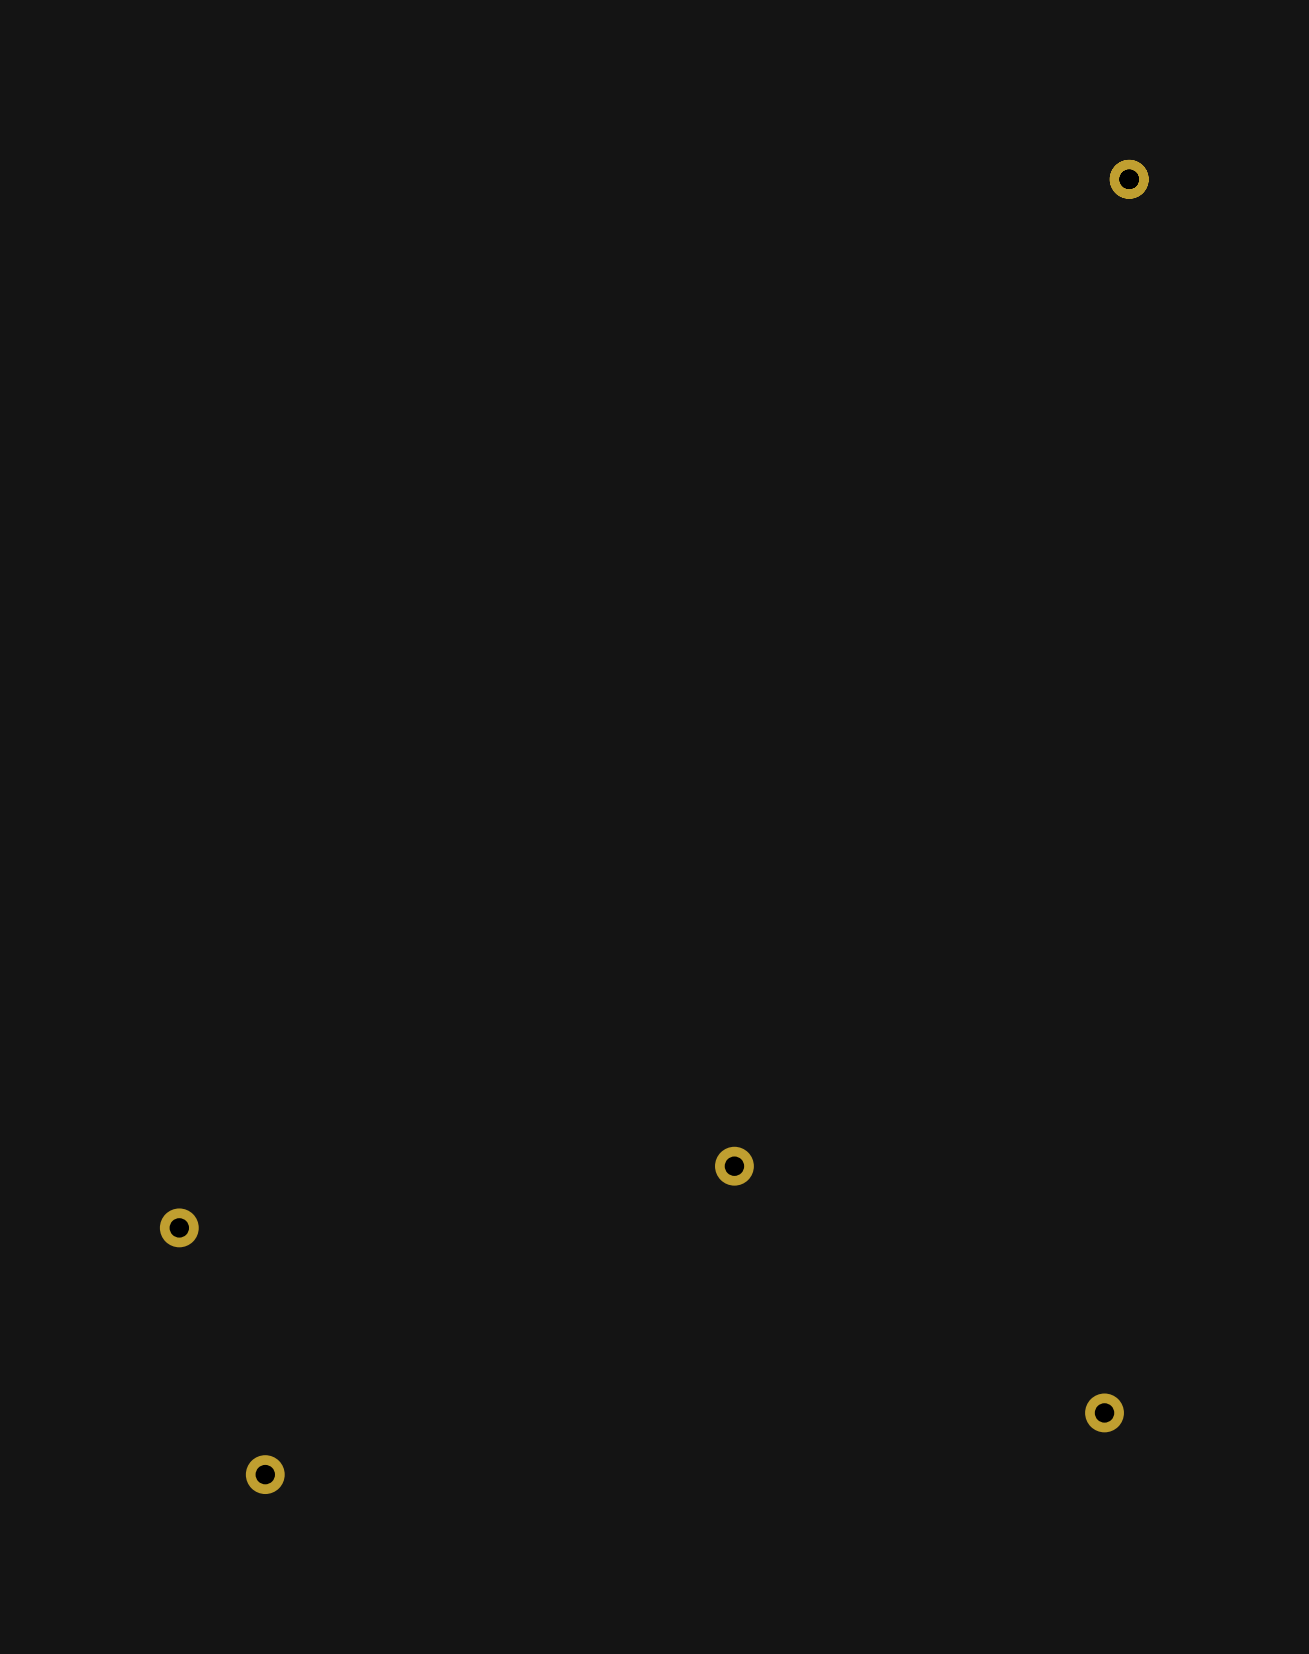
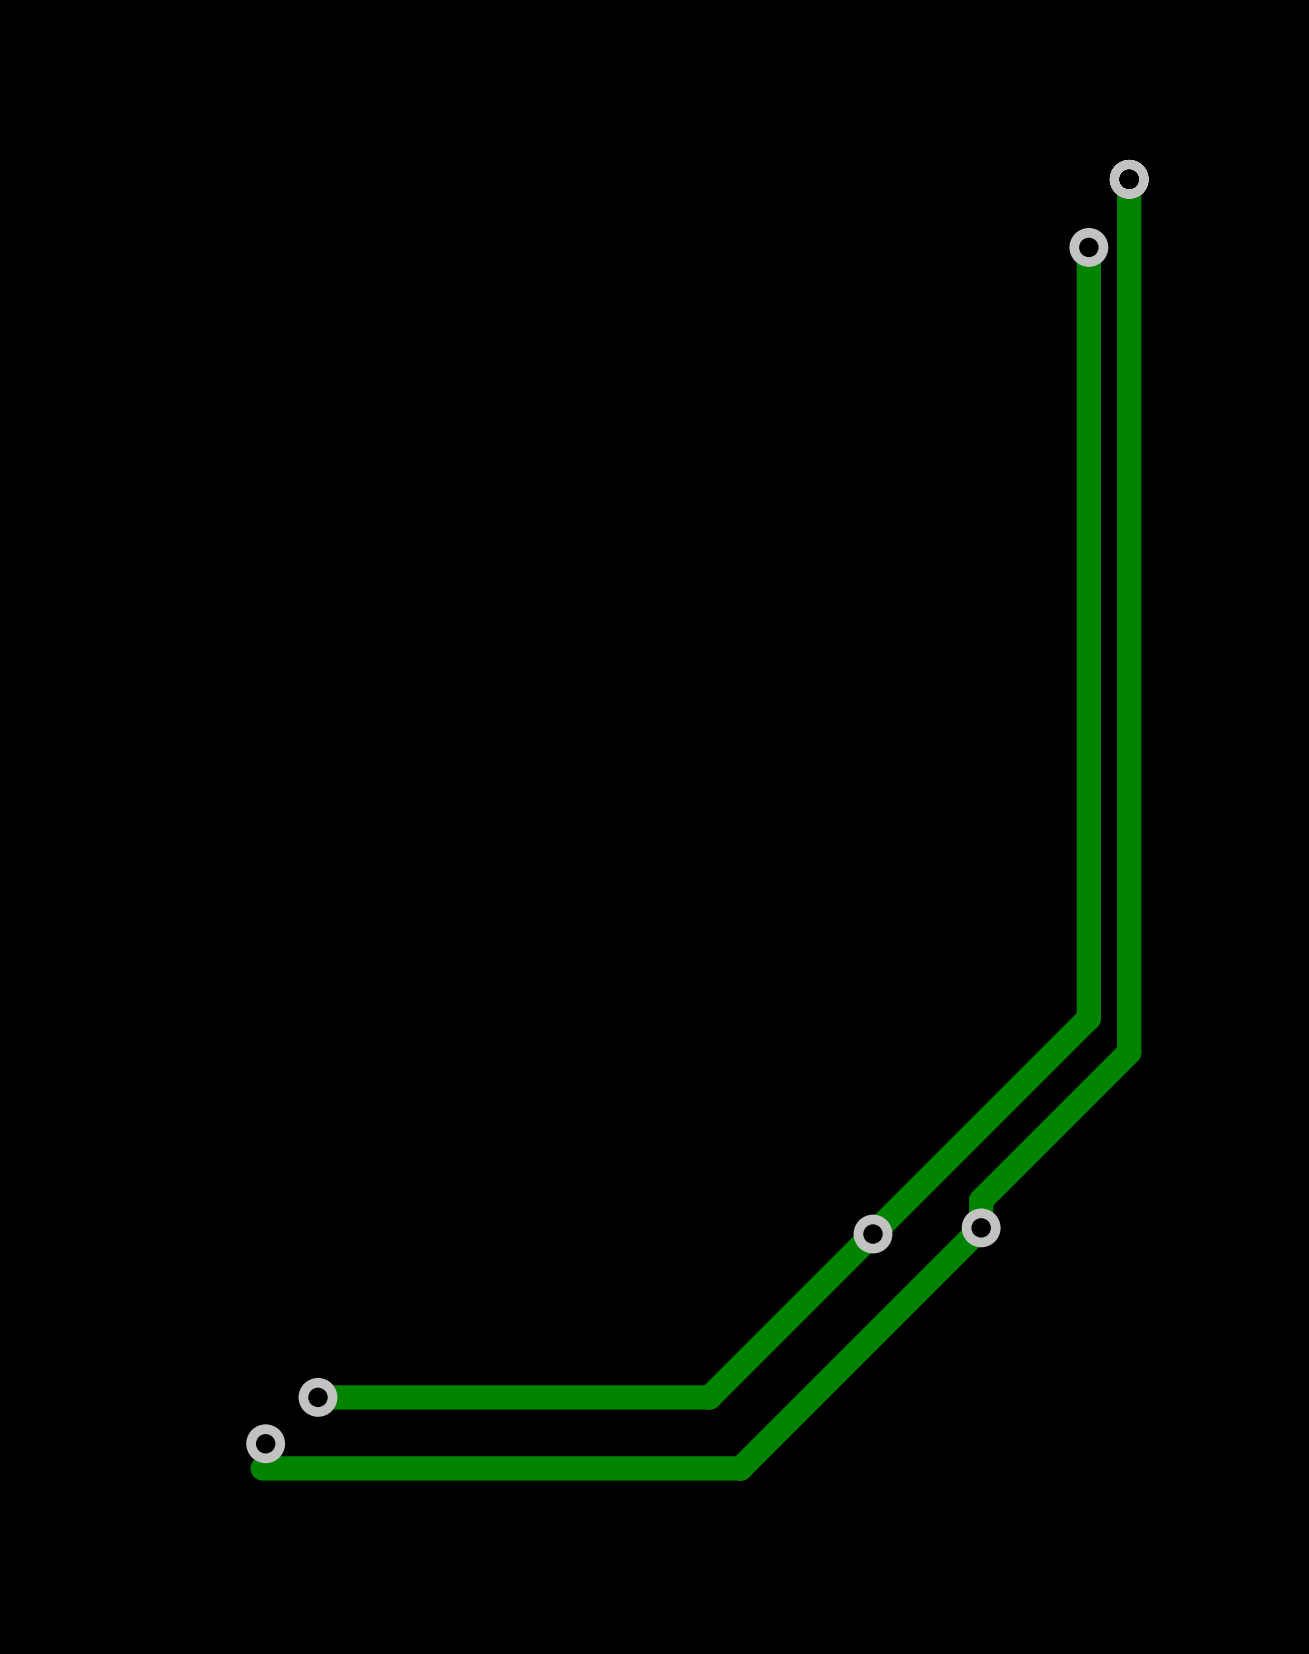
track: none -> (1129, 179) (1129, 1052) (981, 1200) (981, 1227) (740, 1468) (262, 1468)
track: none -> (1088, 247) (1088, 1018) (709, 1397) (317, 1397)
via: none -> (1088, 247)
via: (734, 1166) -> none
via: (179, 1227) -> none
via: none -> (981, 1227)
via: none -> (872, 1234)
via: none -> (317, 1397)
via: (1104, 1412) -> none
via position: (265, 1474) -> (265, 1443)

